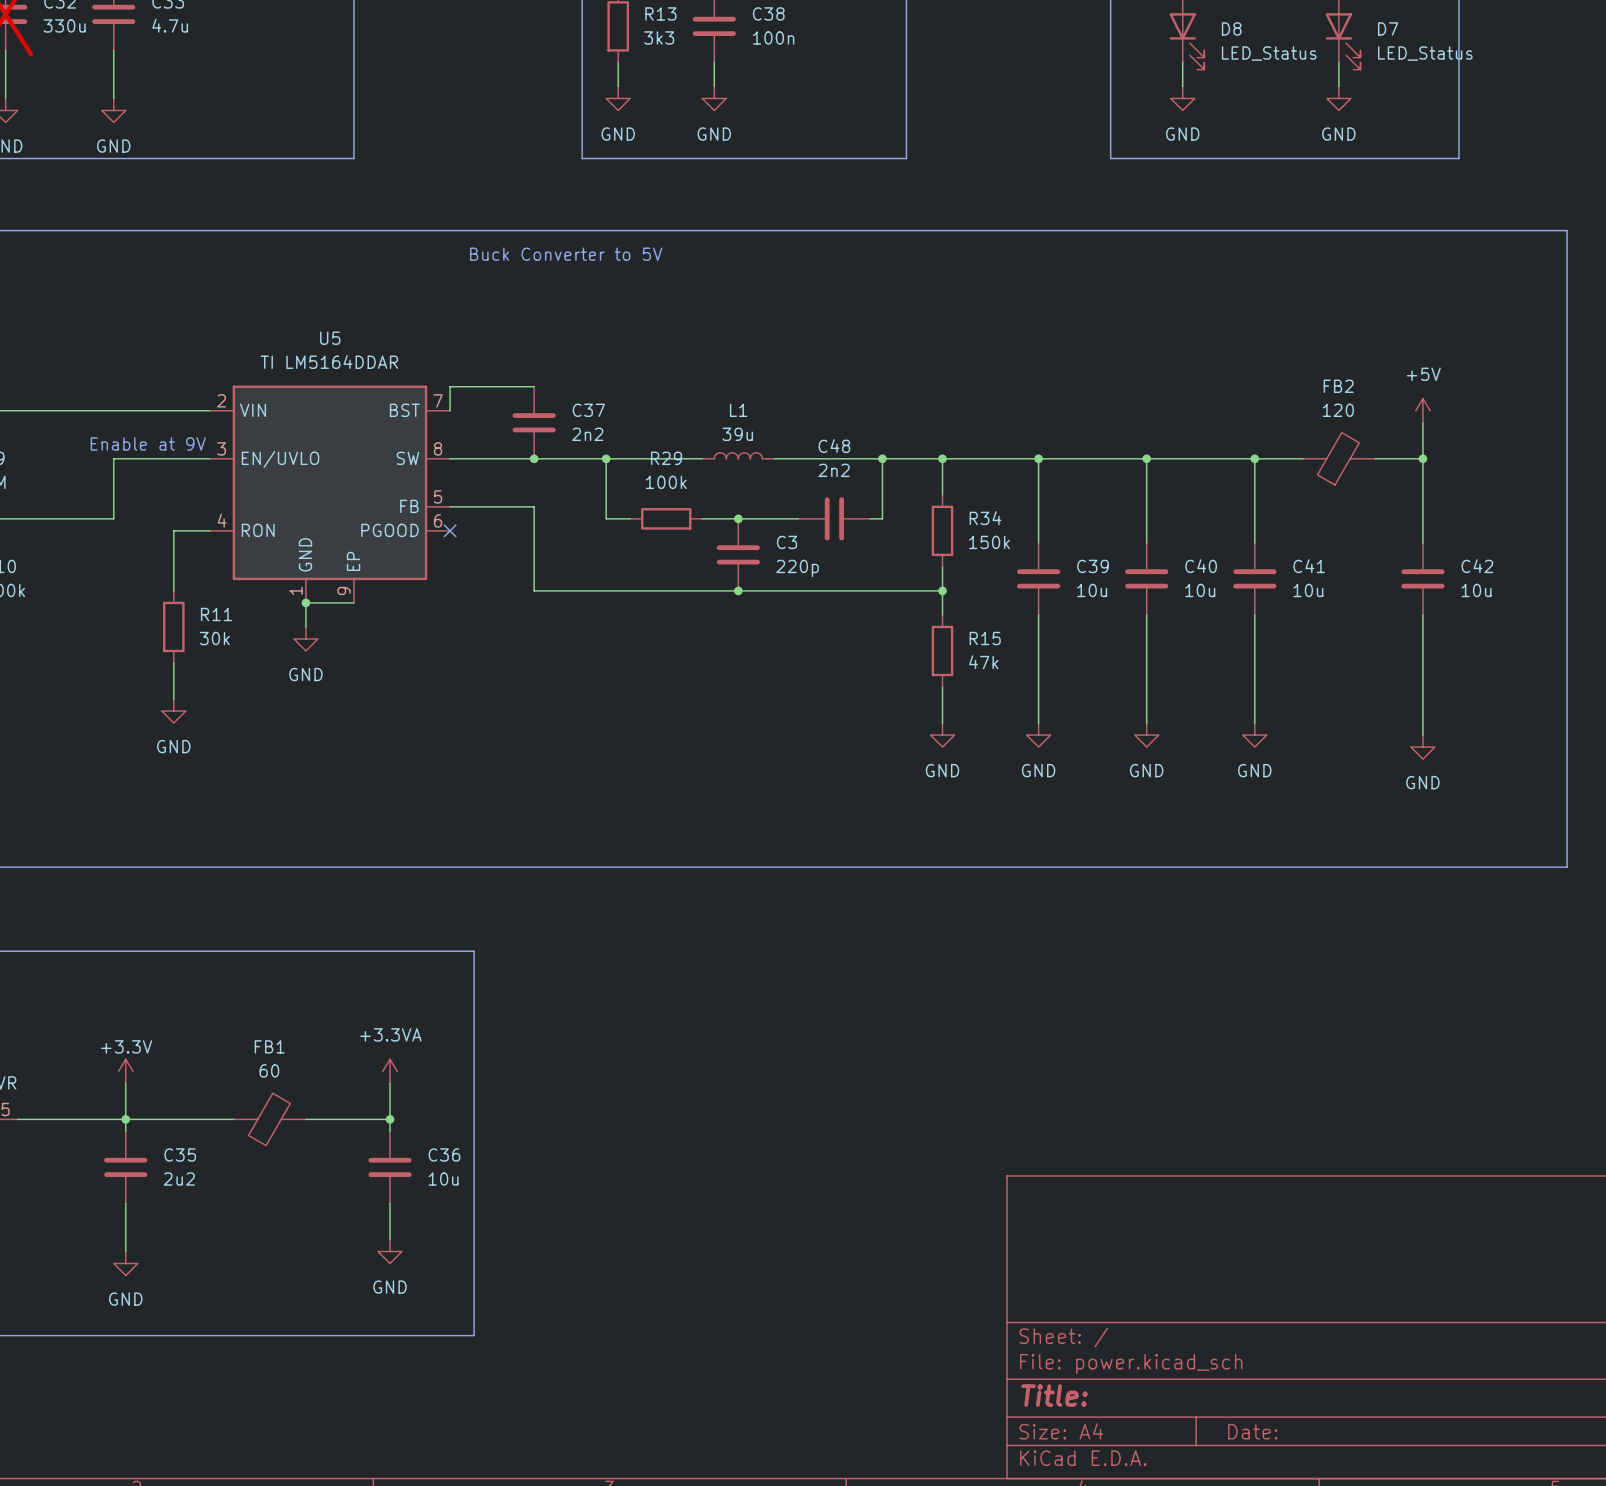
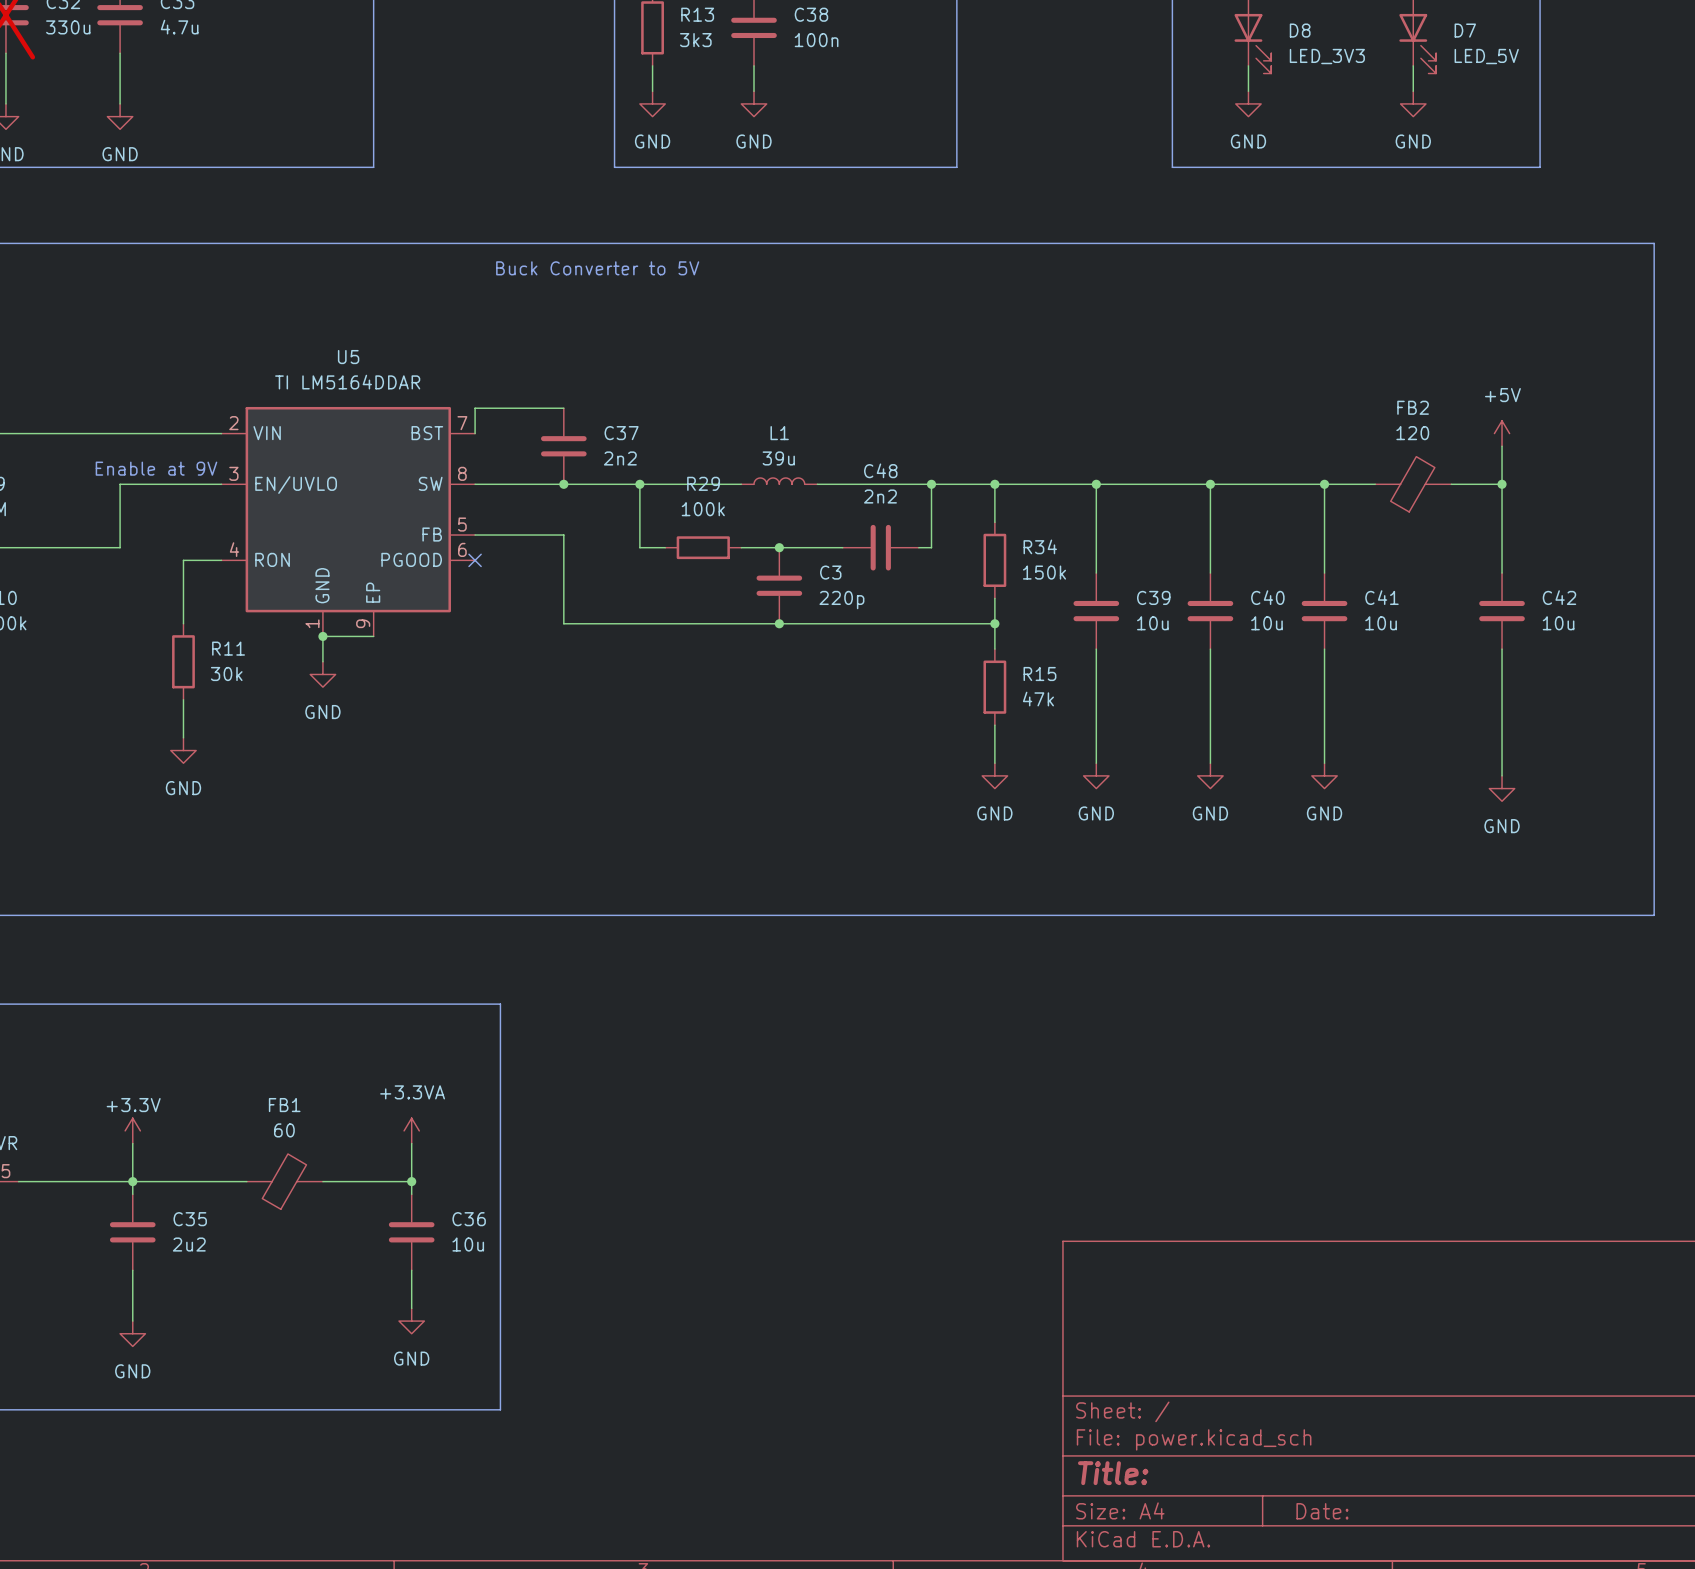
D8 value: LED_Status (1269, 53) -> LED_3V3 (1327, 56)
D7 value: LED_Status (1425, 53) -> LED_5V (1486, 56)

